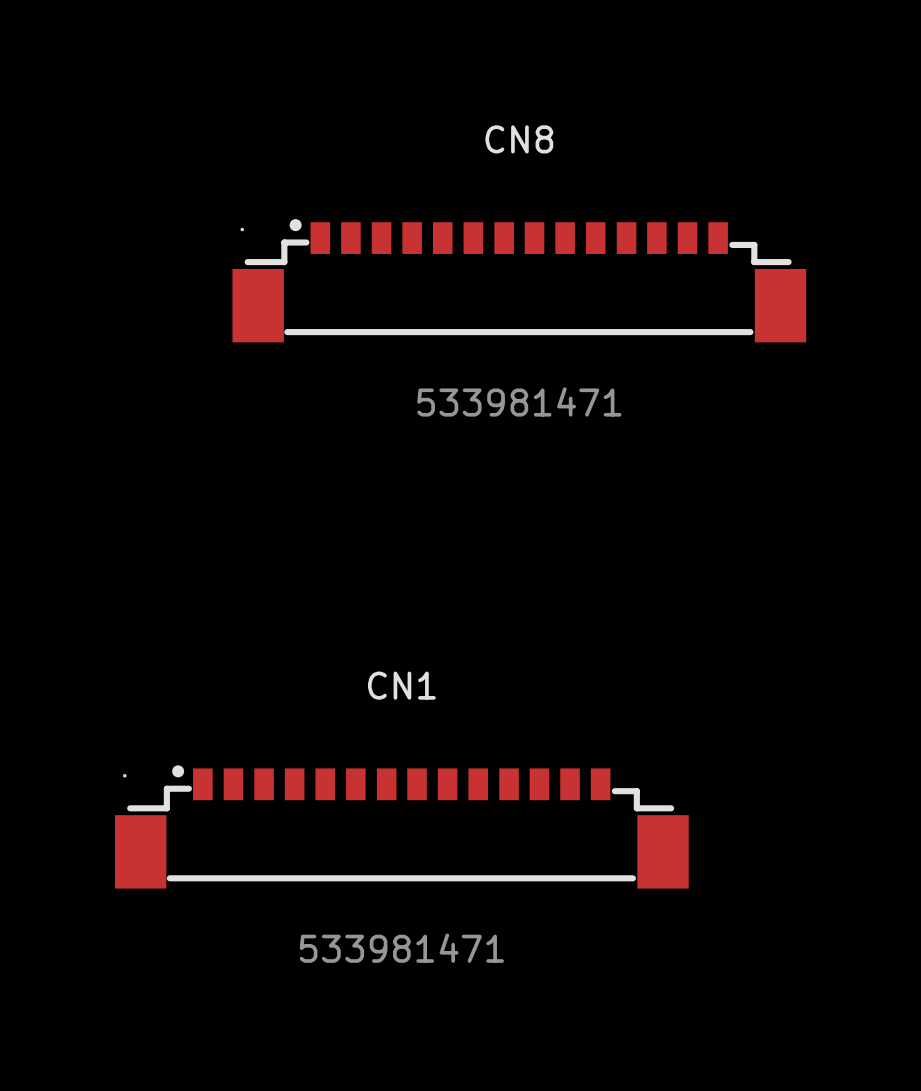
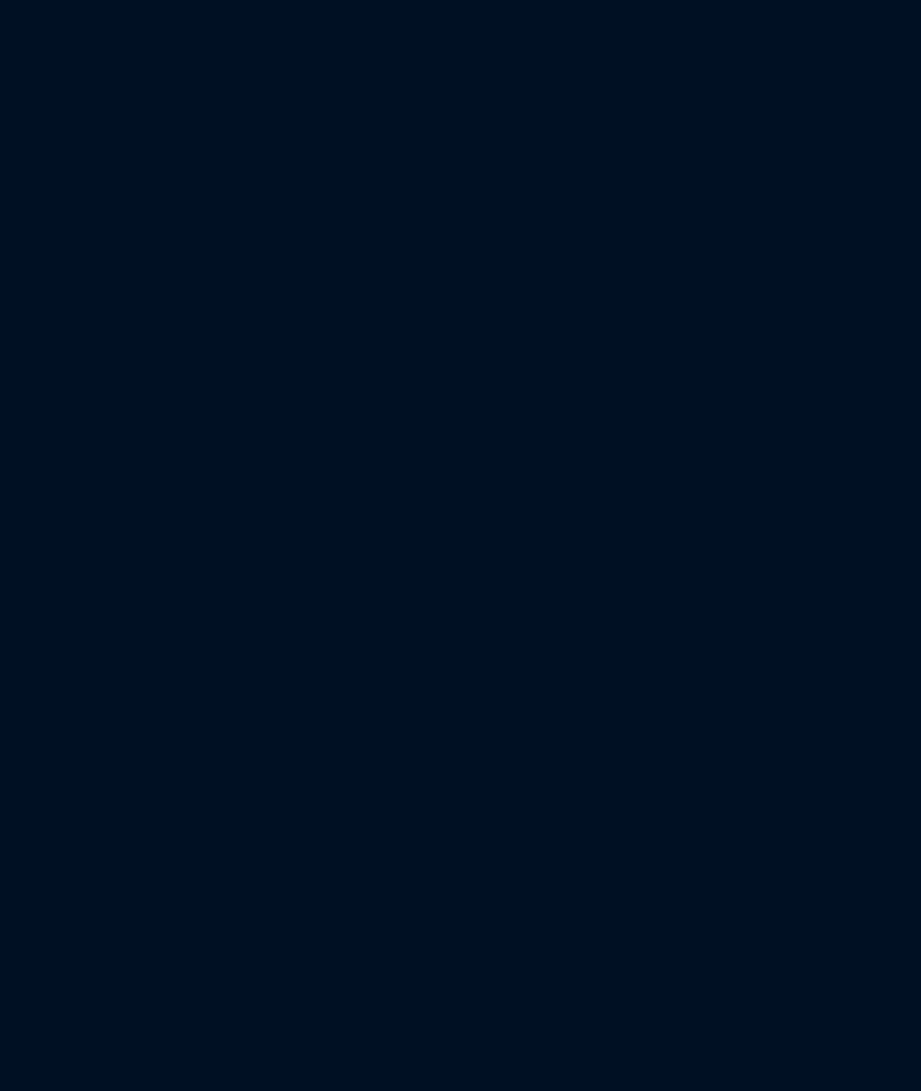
CN8: 533981471 (519, 280) -> none
CN1: 533981471 (401, 826) -> none

